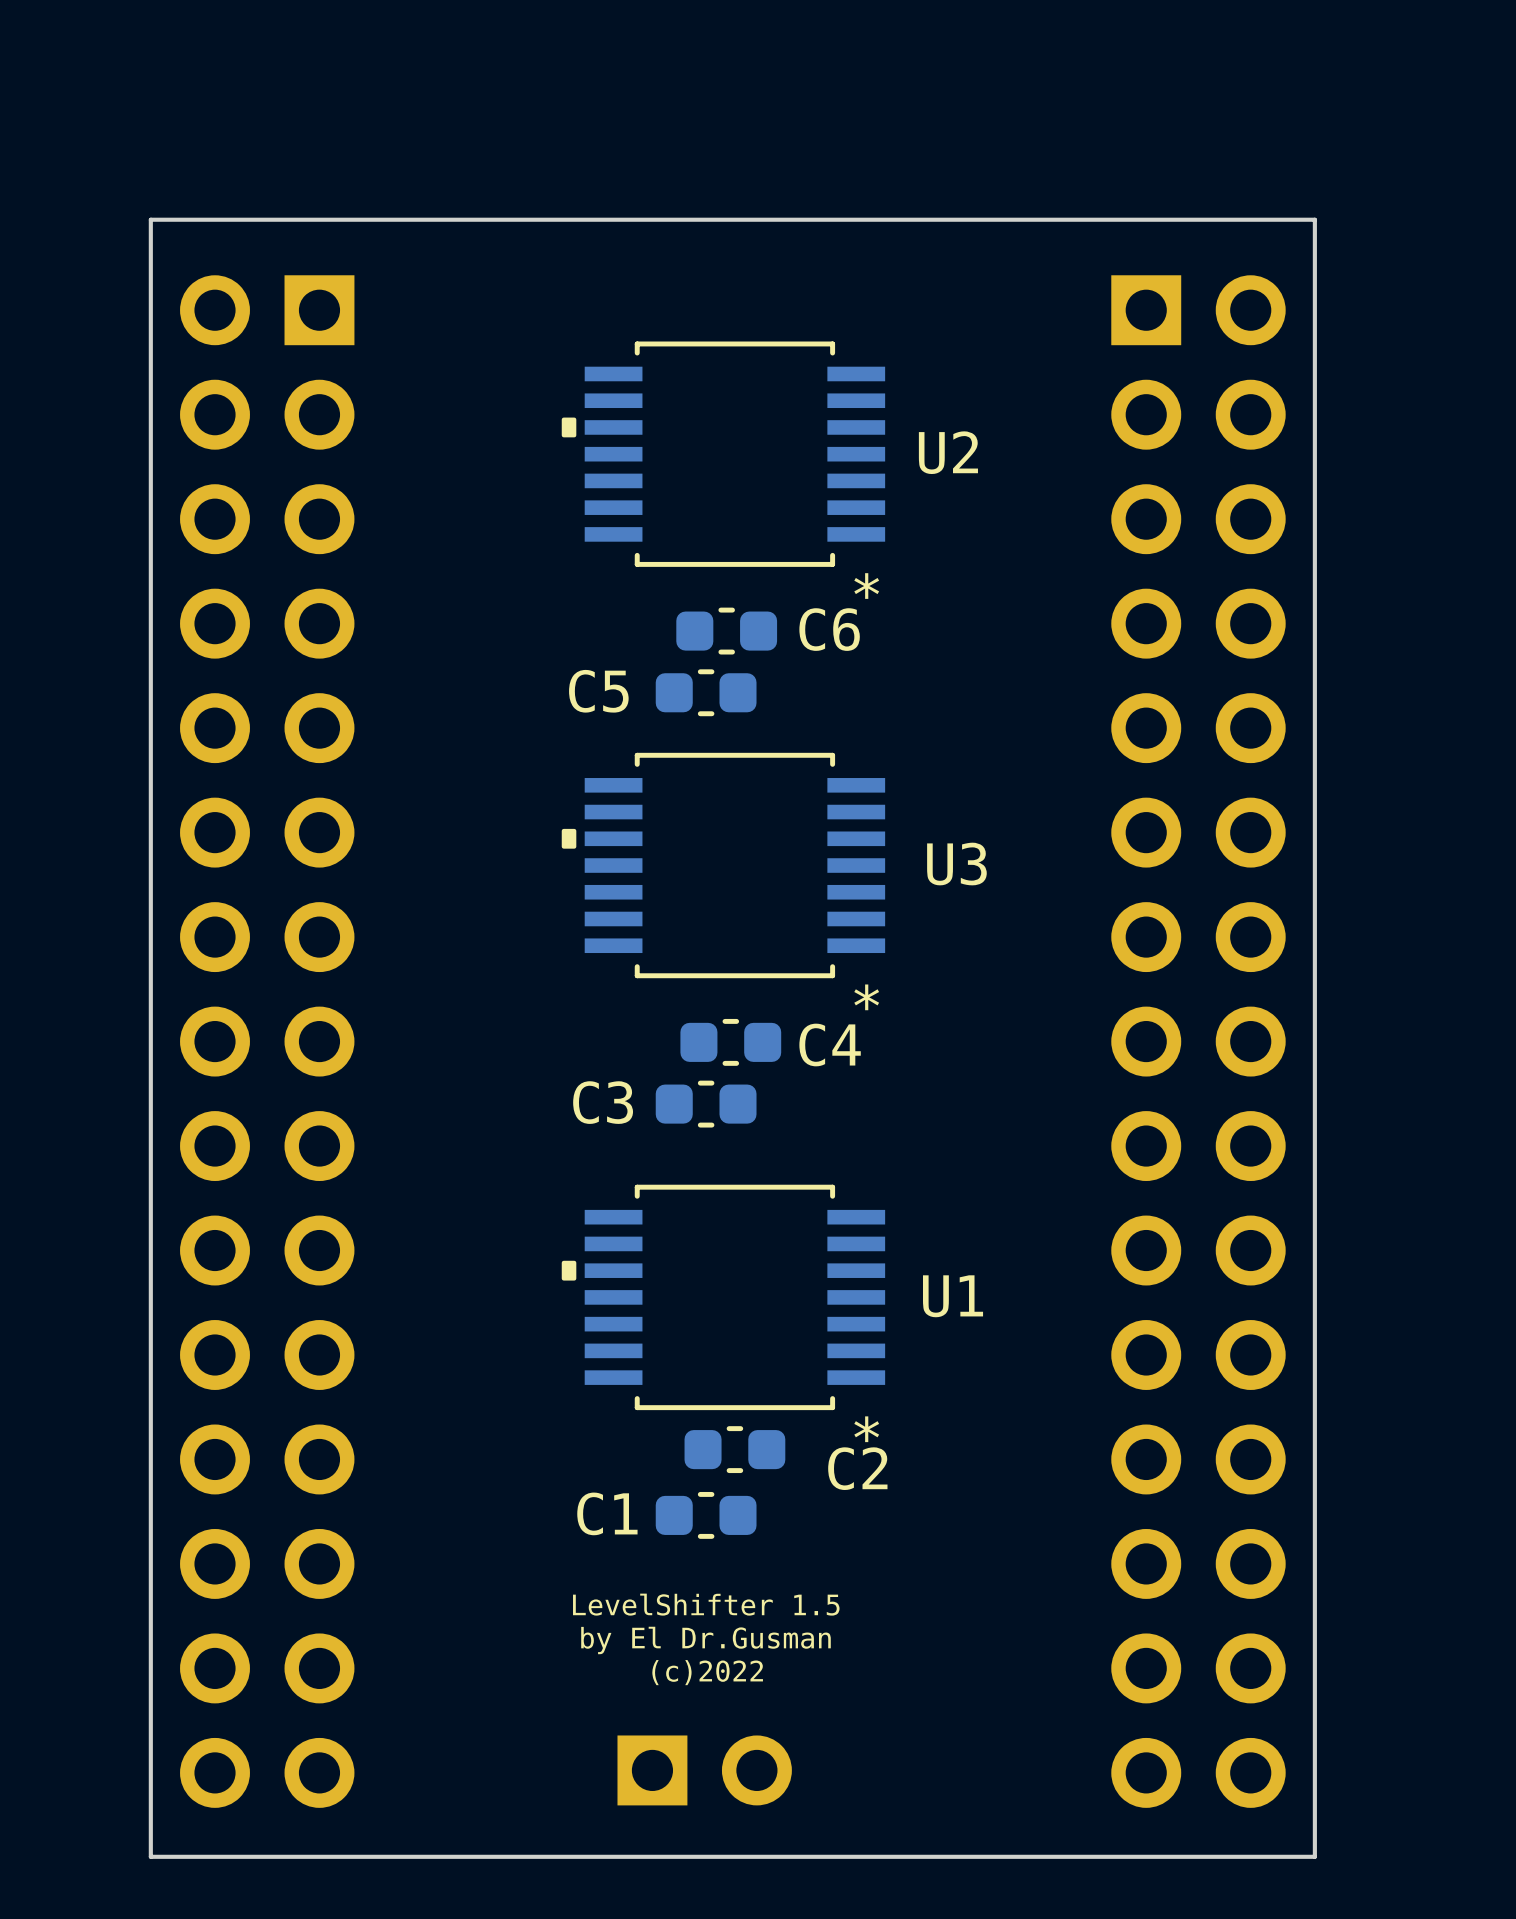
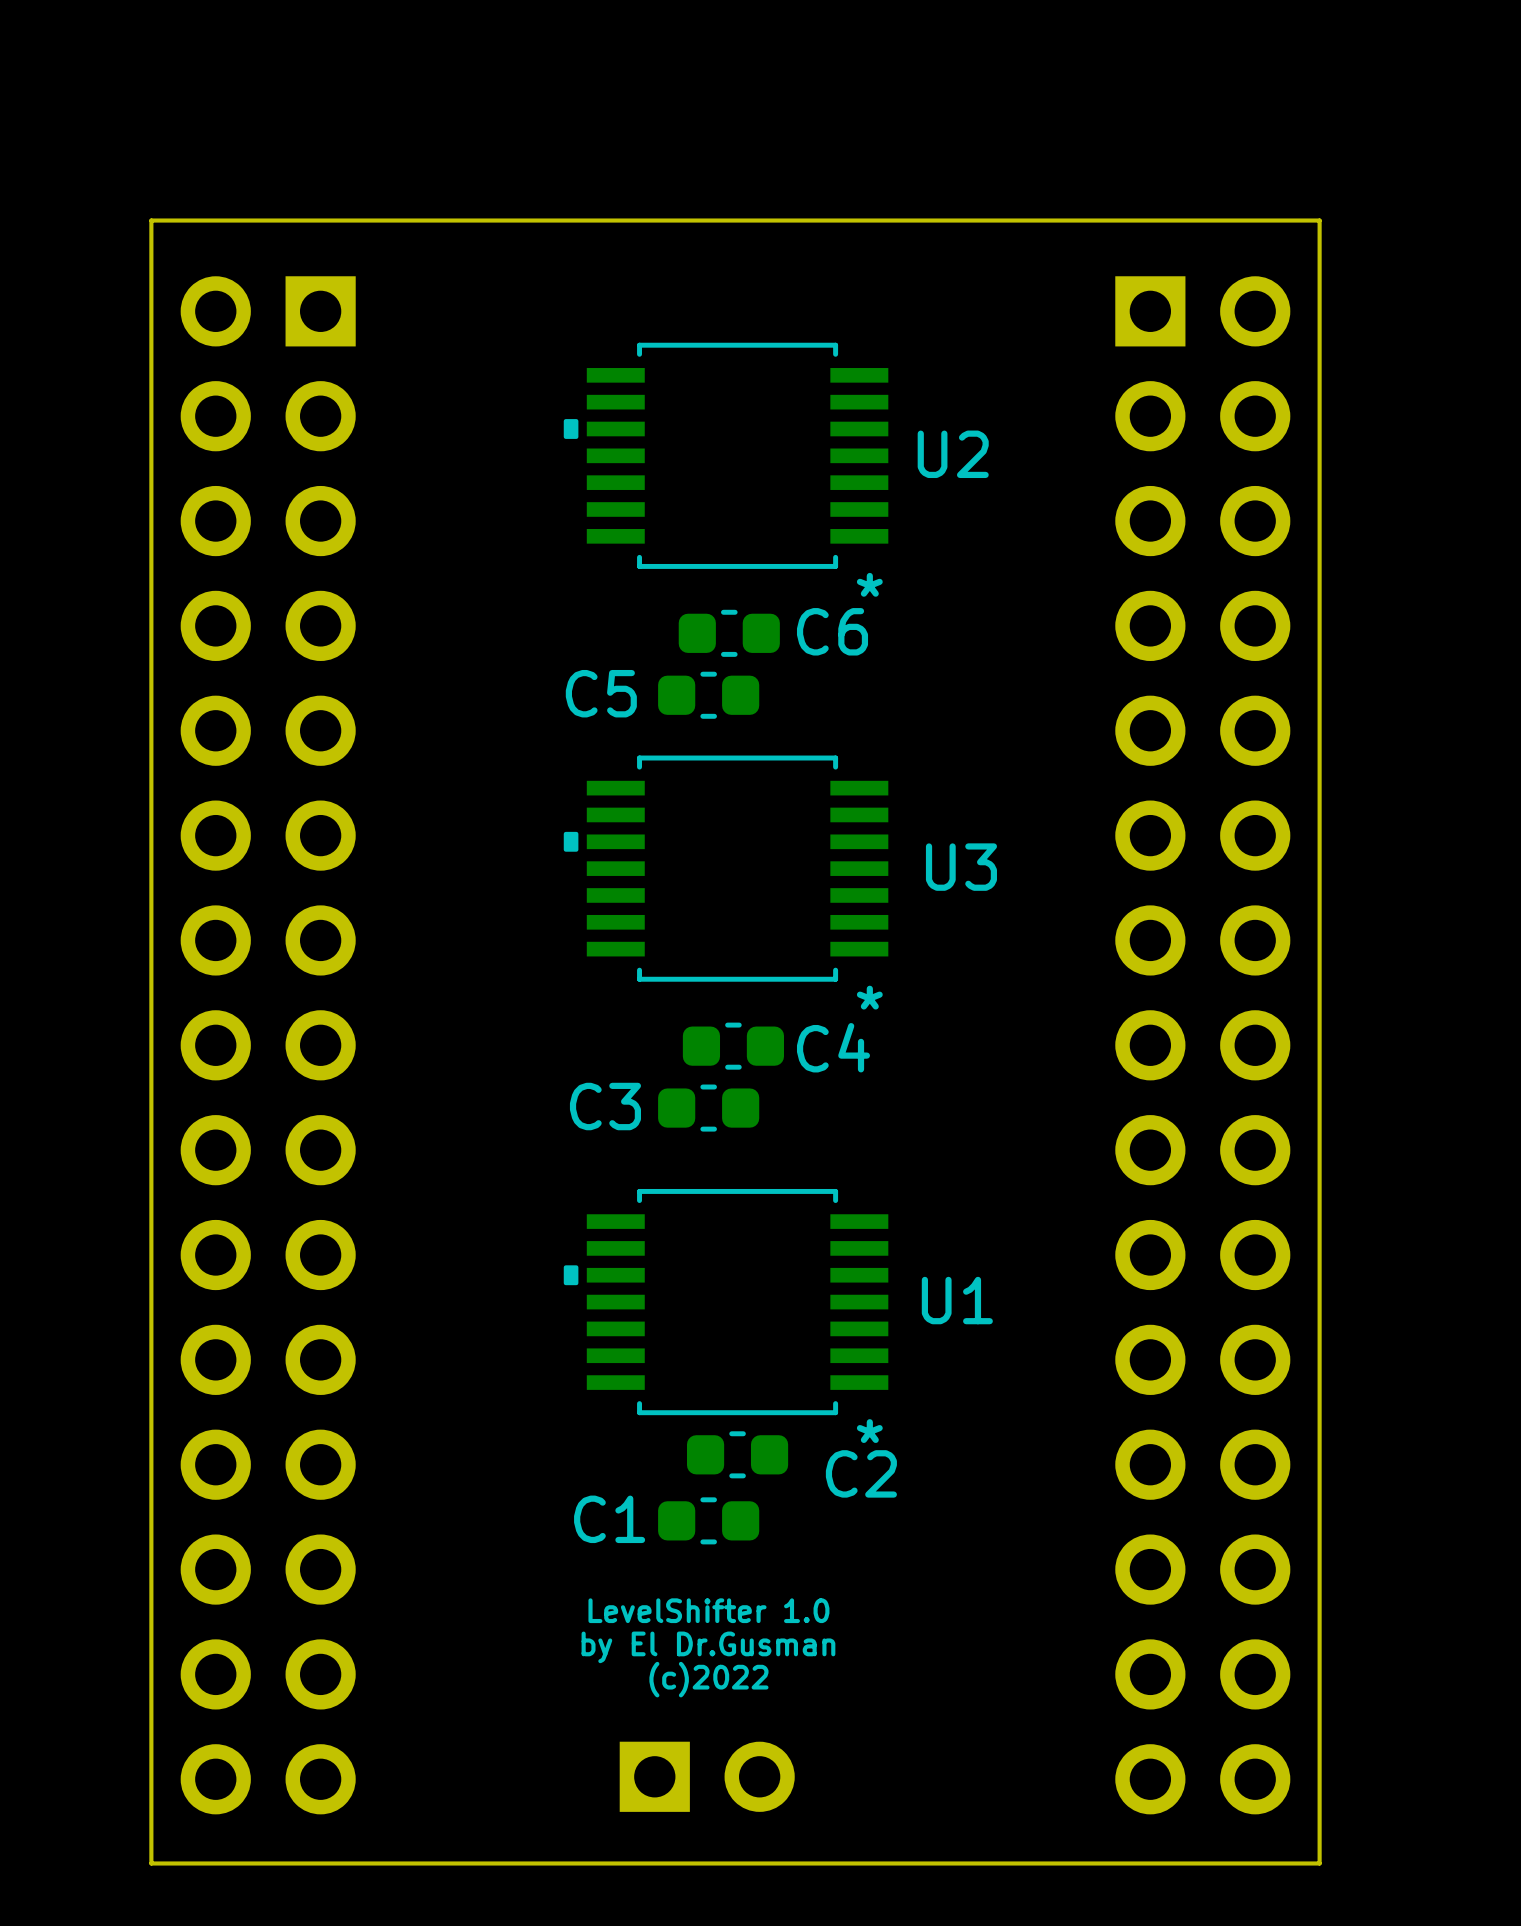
text: LevelShifter 1.5 (706, 1604) -> LevelShifter 1.0 (708, 1610)

